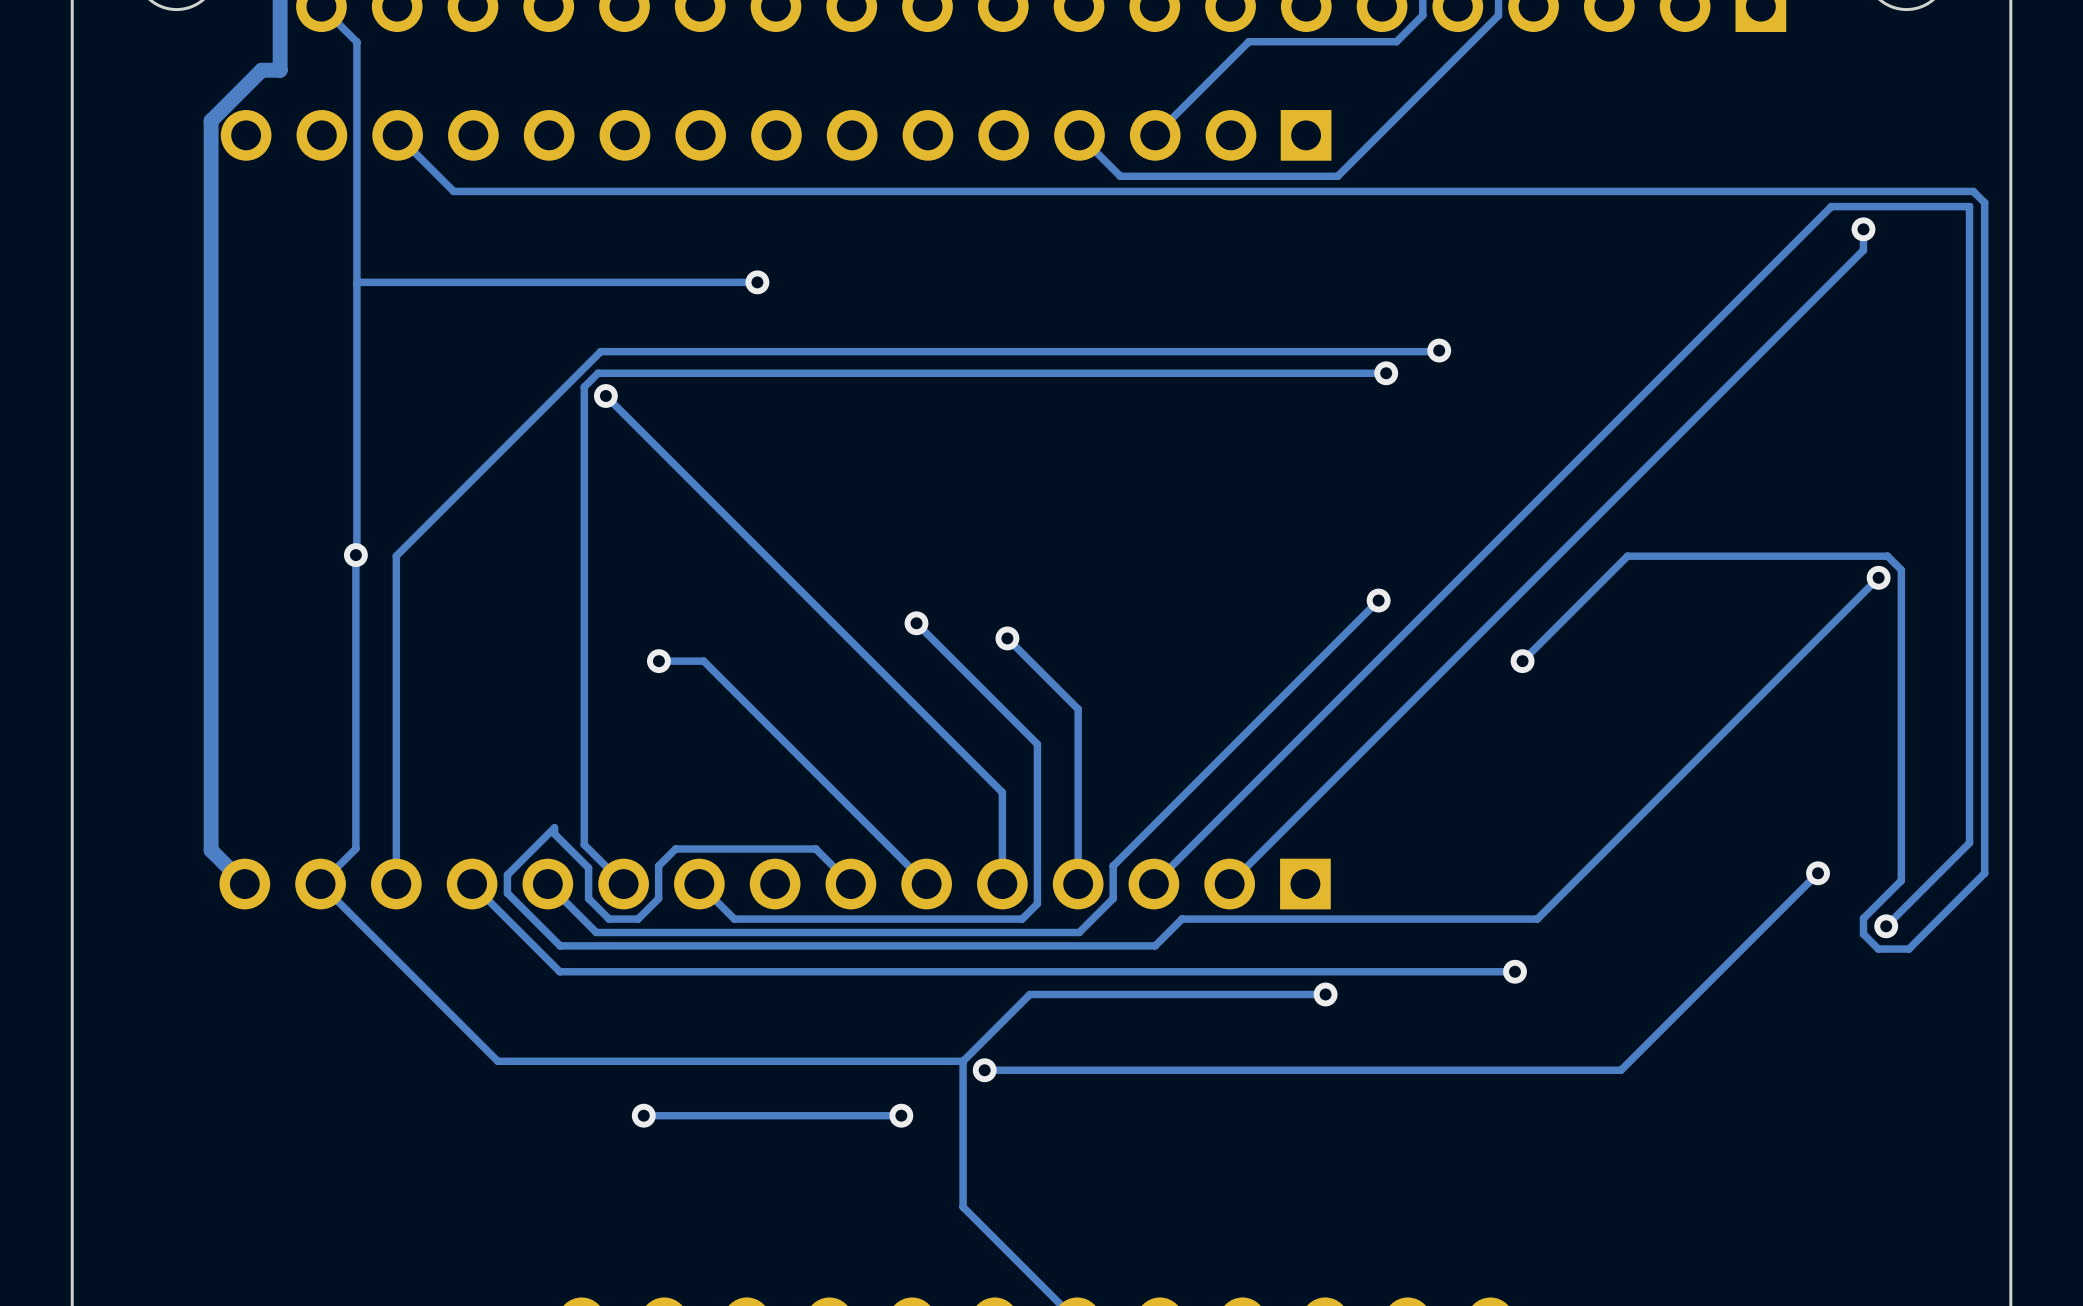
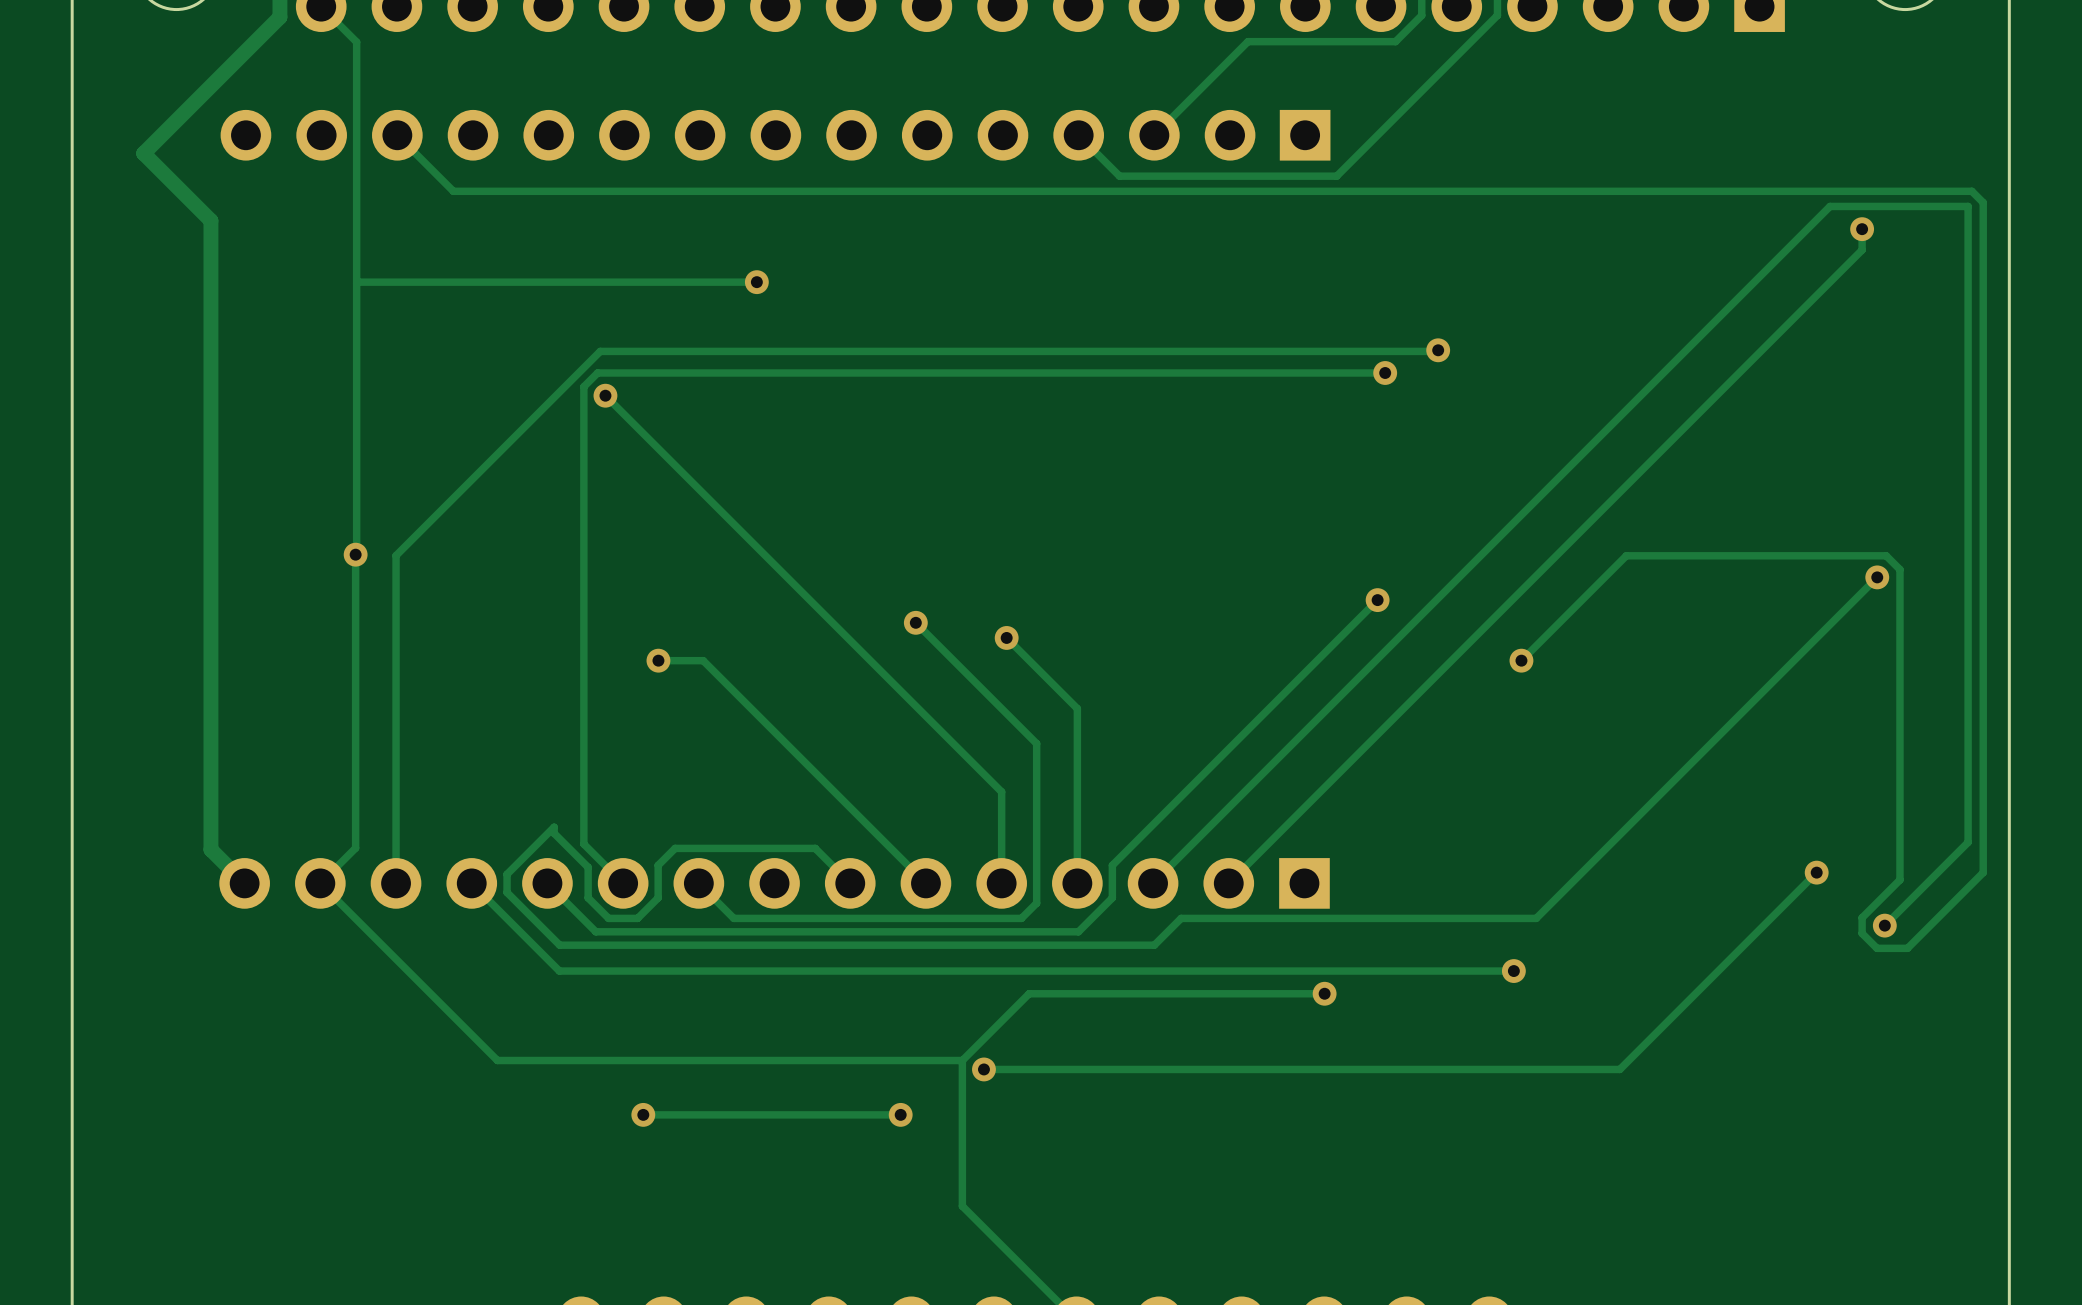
track: (280, 17) (280, 70) (261, 70) (211, 120) (211, 220) -> (279, 17) (143, 153) (210, 220)

